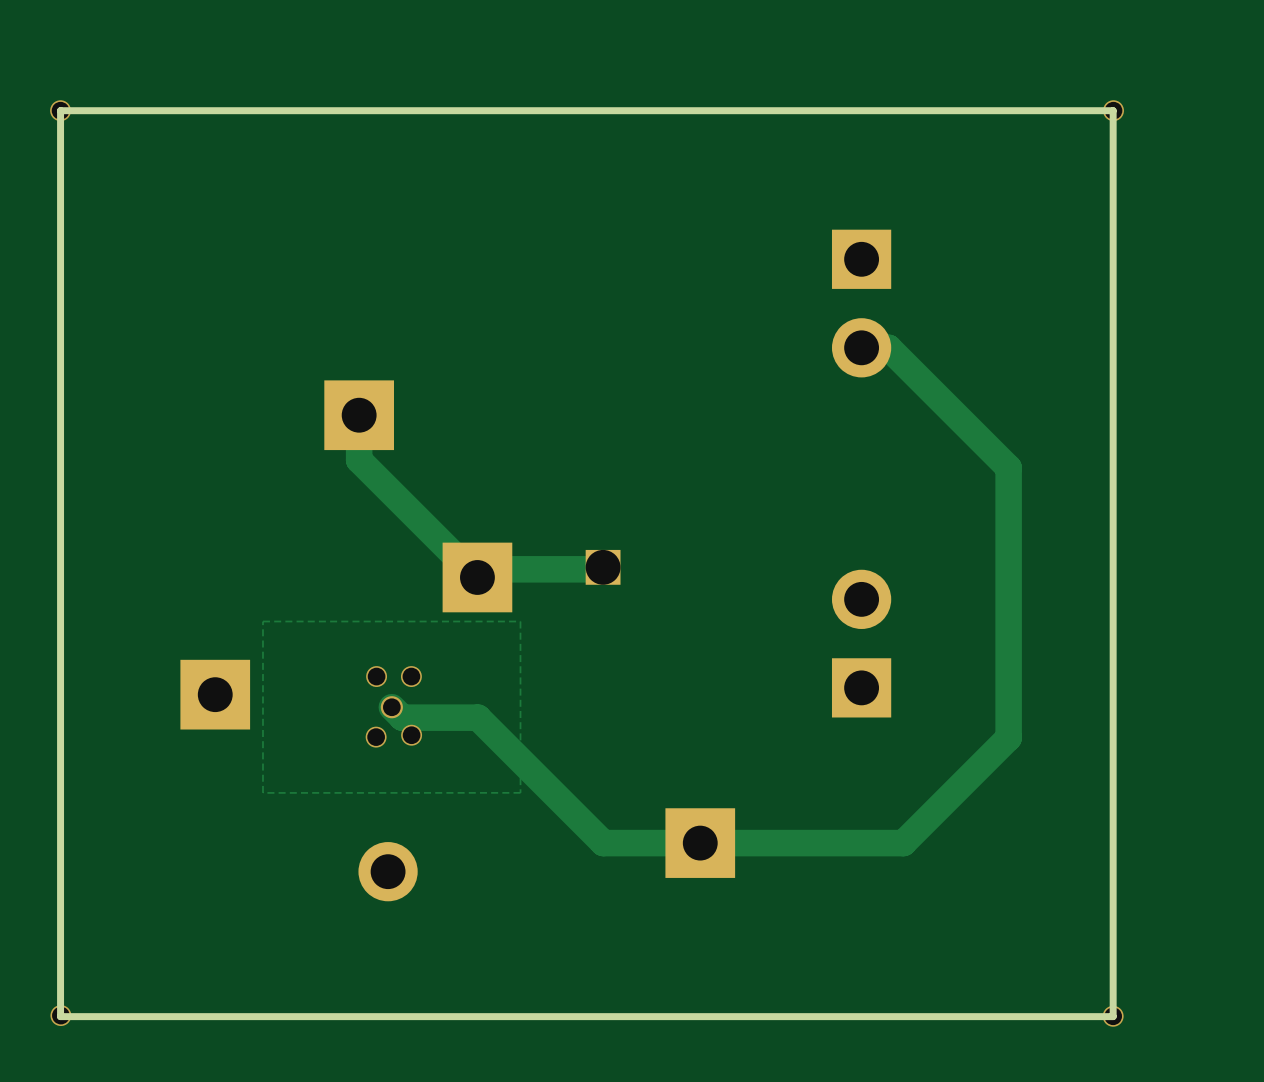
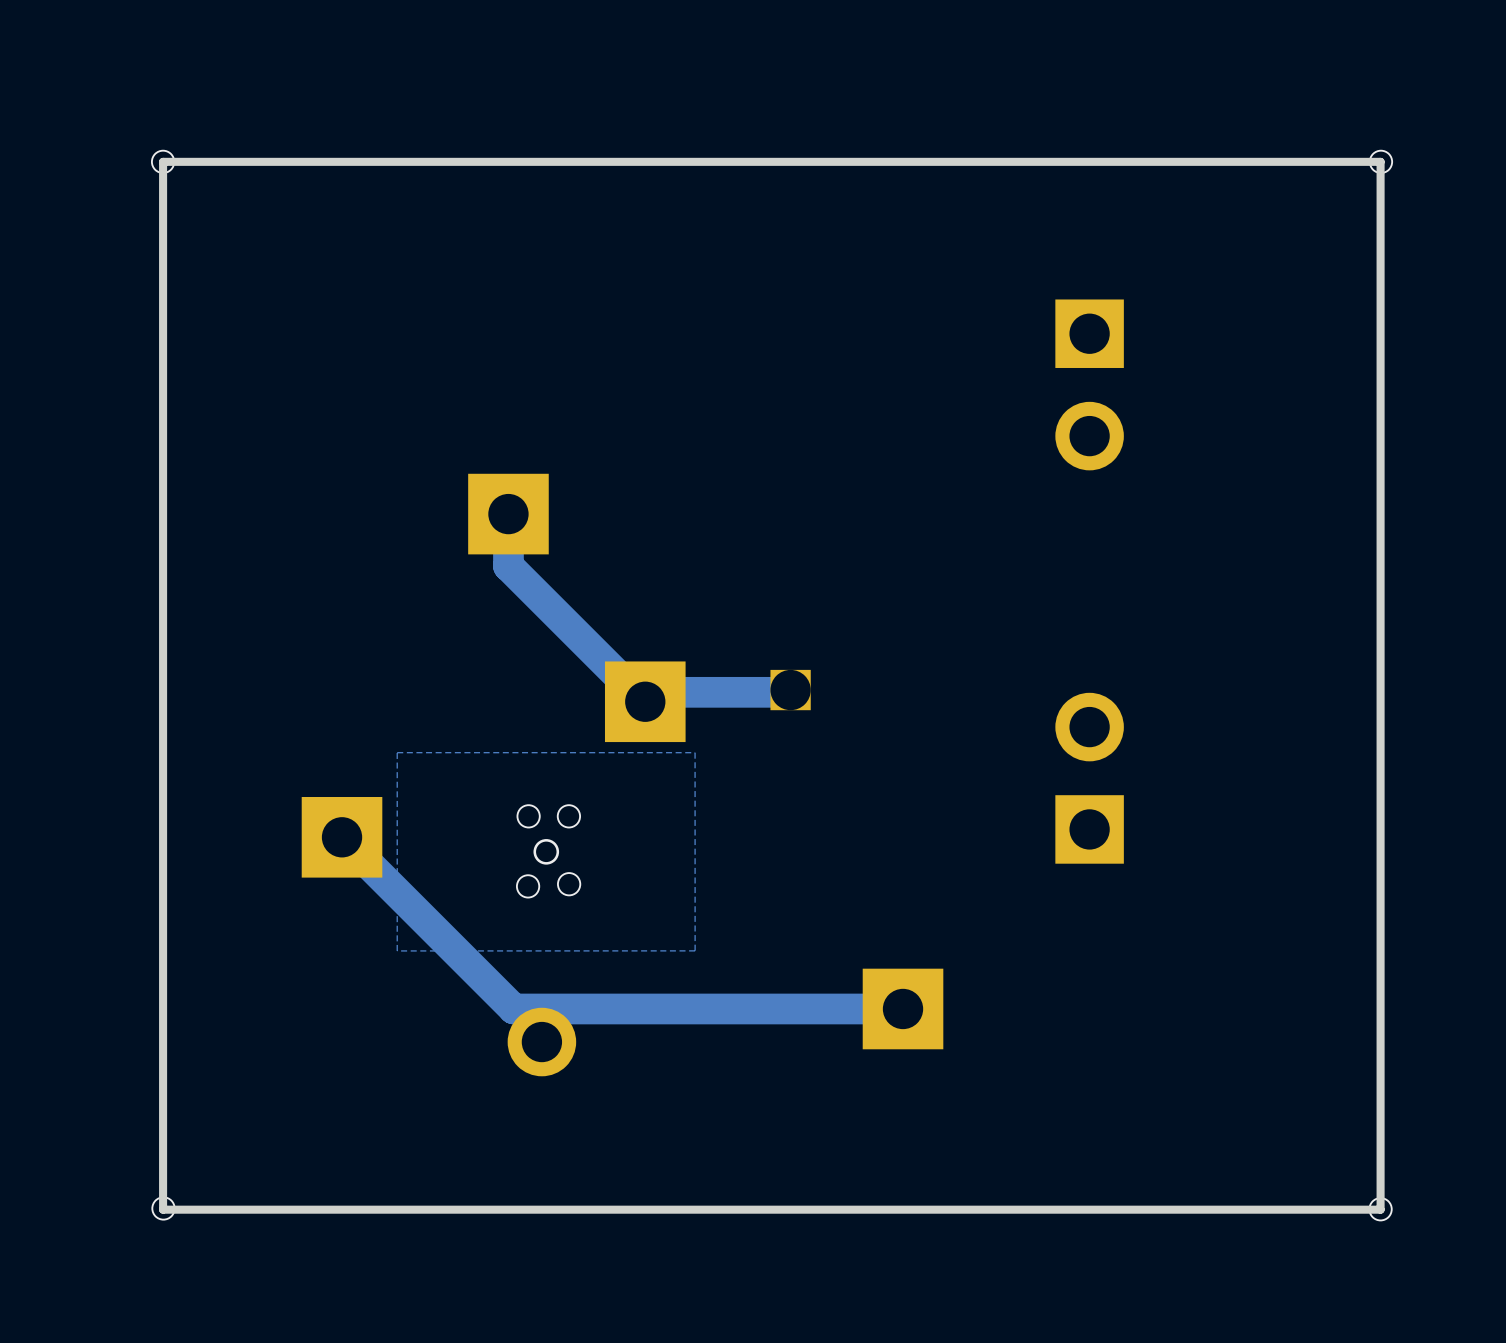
track: (861, 347) (888, 347) (1008, 467) (1008, 737) (903, 843) (700, 843) -> none
track: (391, 707) (402, 717) (477, 717) (603, 843) -> (342, 837) (513, 1008) (790, 1008)

